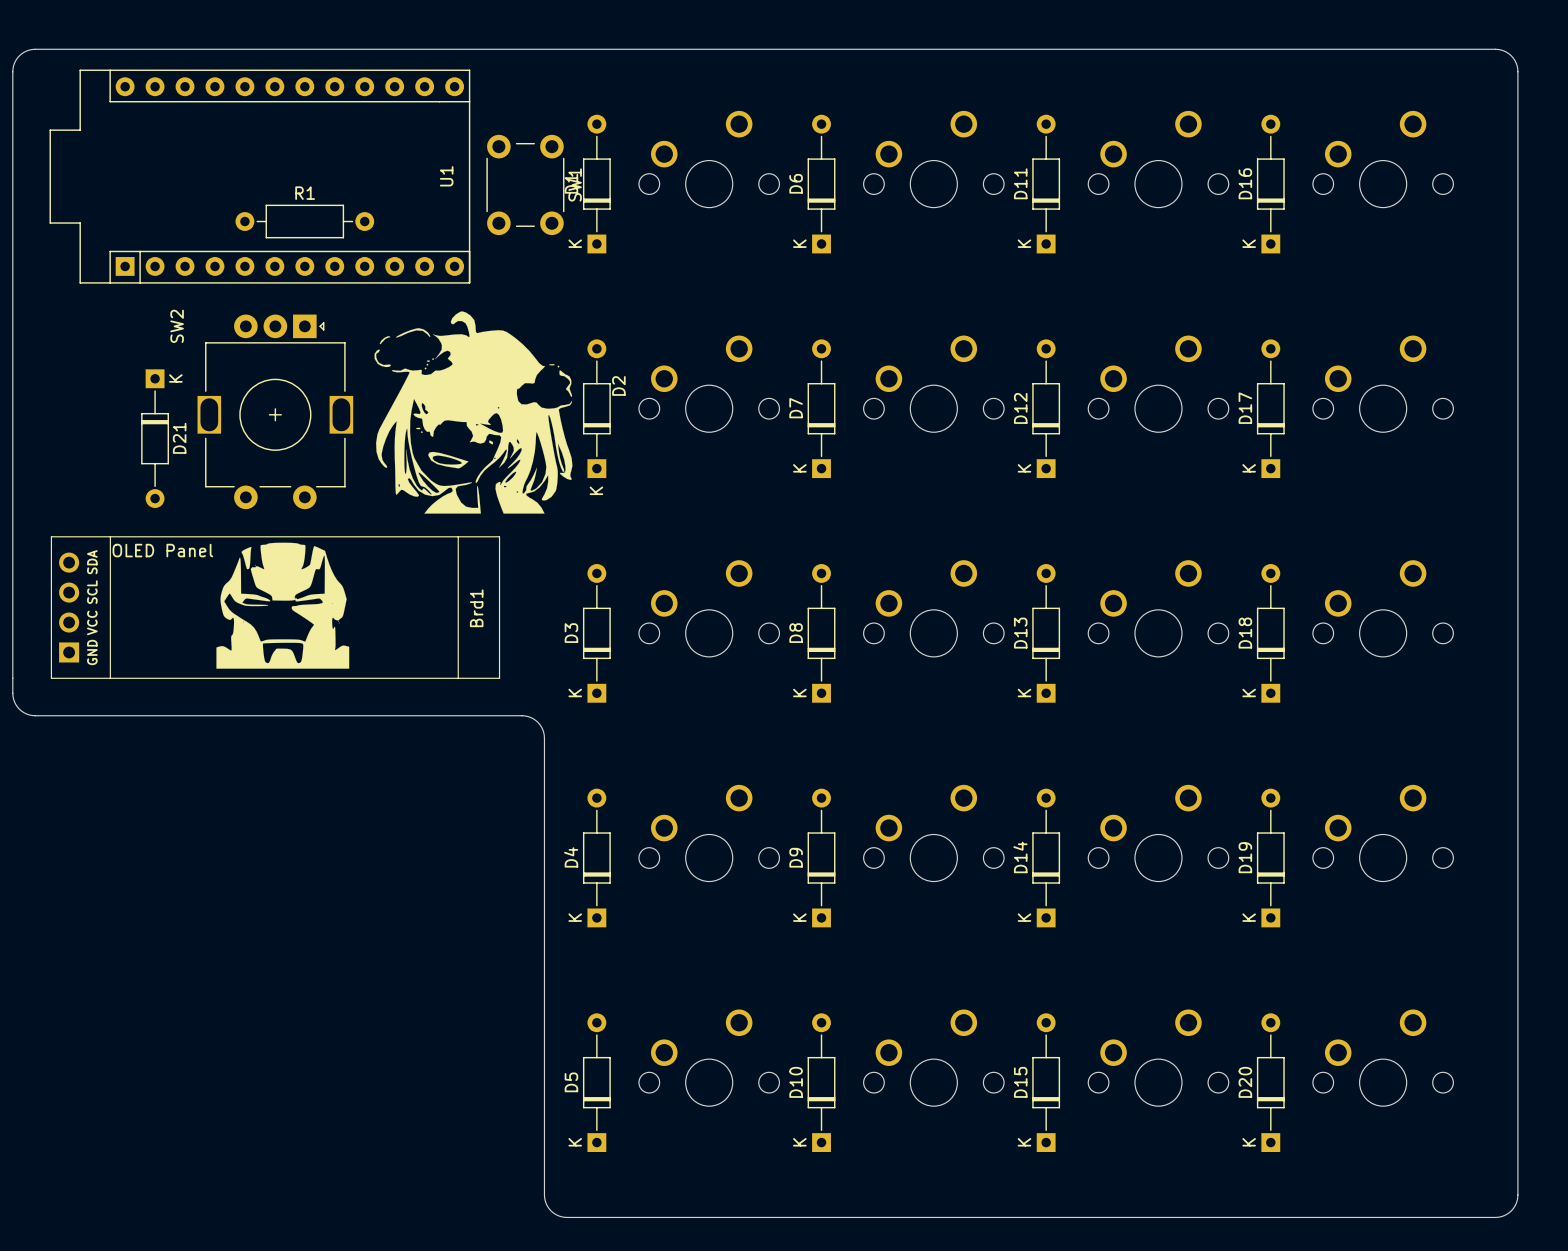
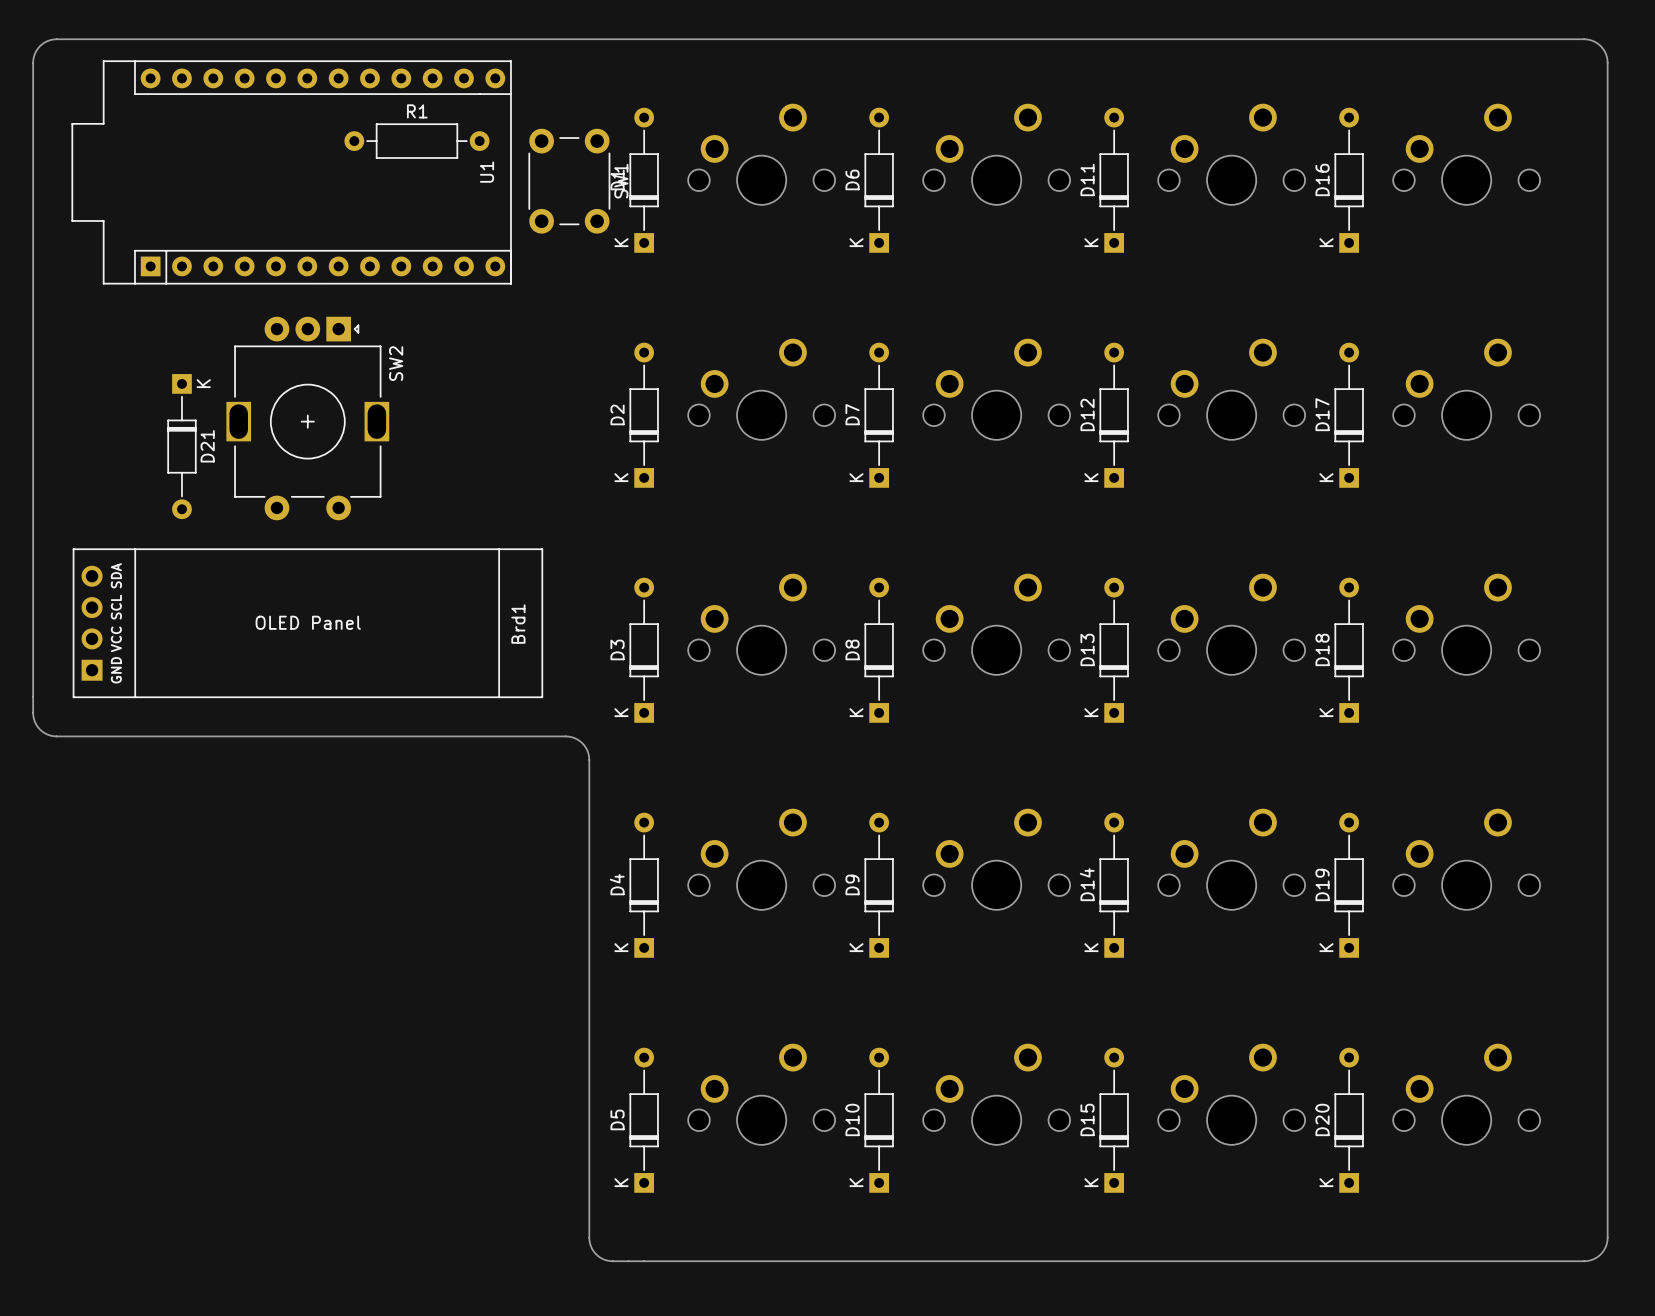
R1 position: (304, 221) -> (416, 141)
drawing: [374, 311, 573, 514] -> none
SW2 name position: SW2 (177, 326) -> SW2 (396, 363)
D2 name position: D2 (618, 385) -> D2 (617, 414)
D2 text position: K (596, 490) -> K (621, 477)
drawing: [216, 542, 350, 669] -> none
Brd1 text position: OLED Panel (162, 550) -> OLED Panel (308, 622)

